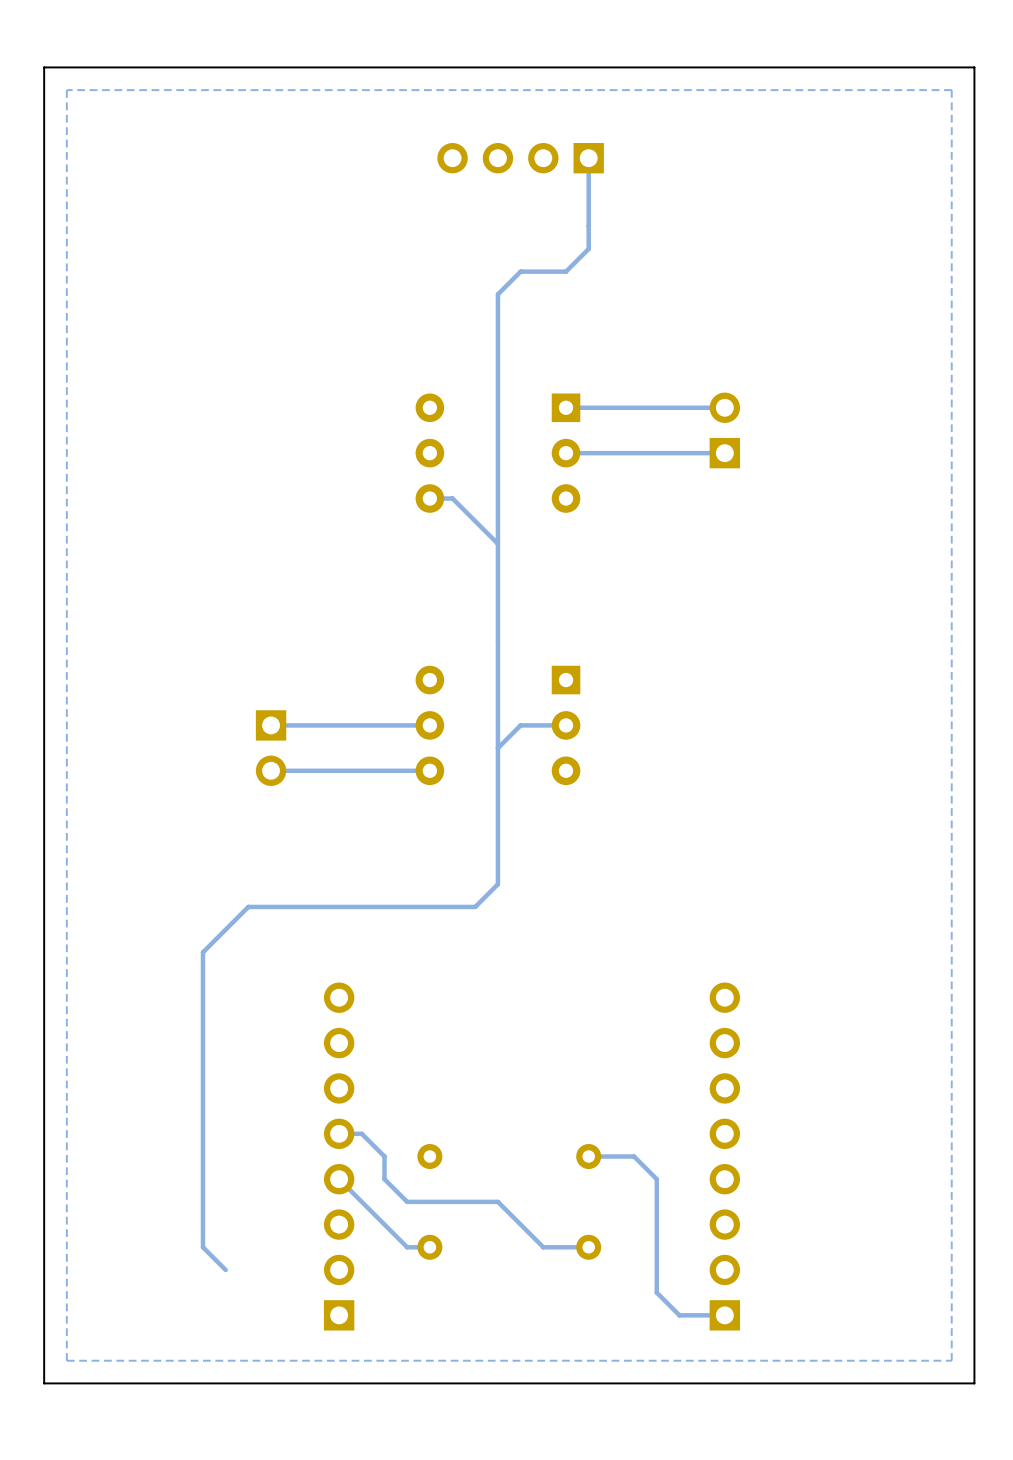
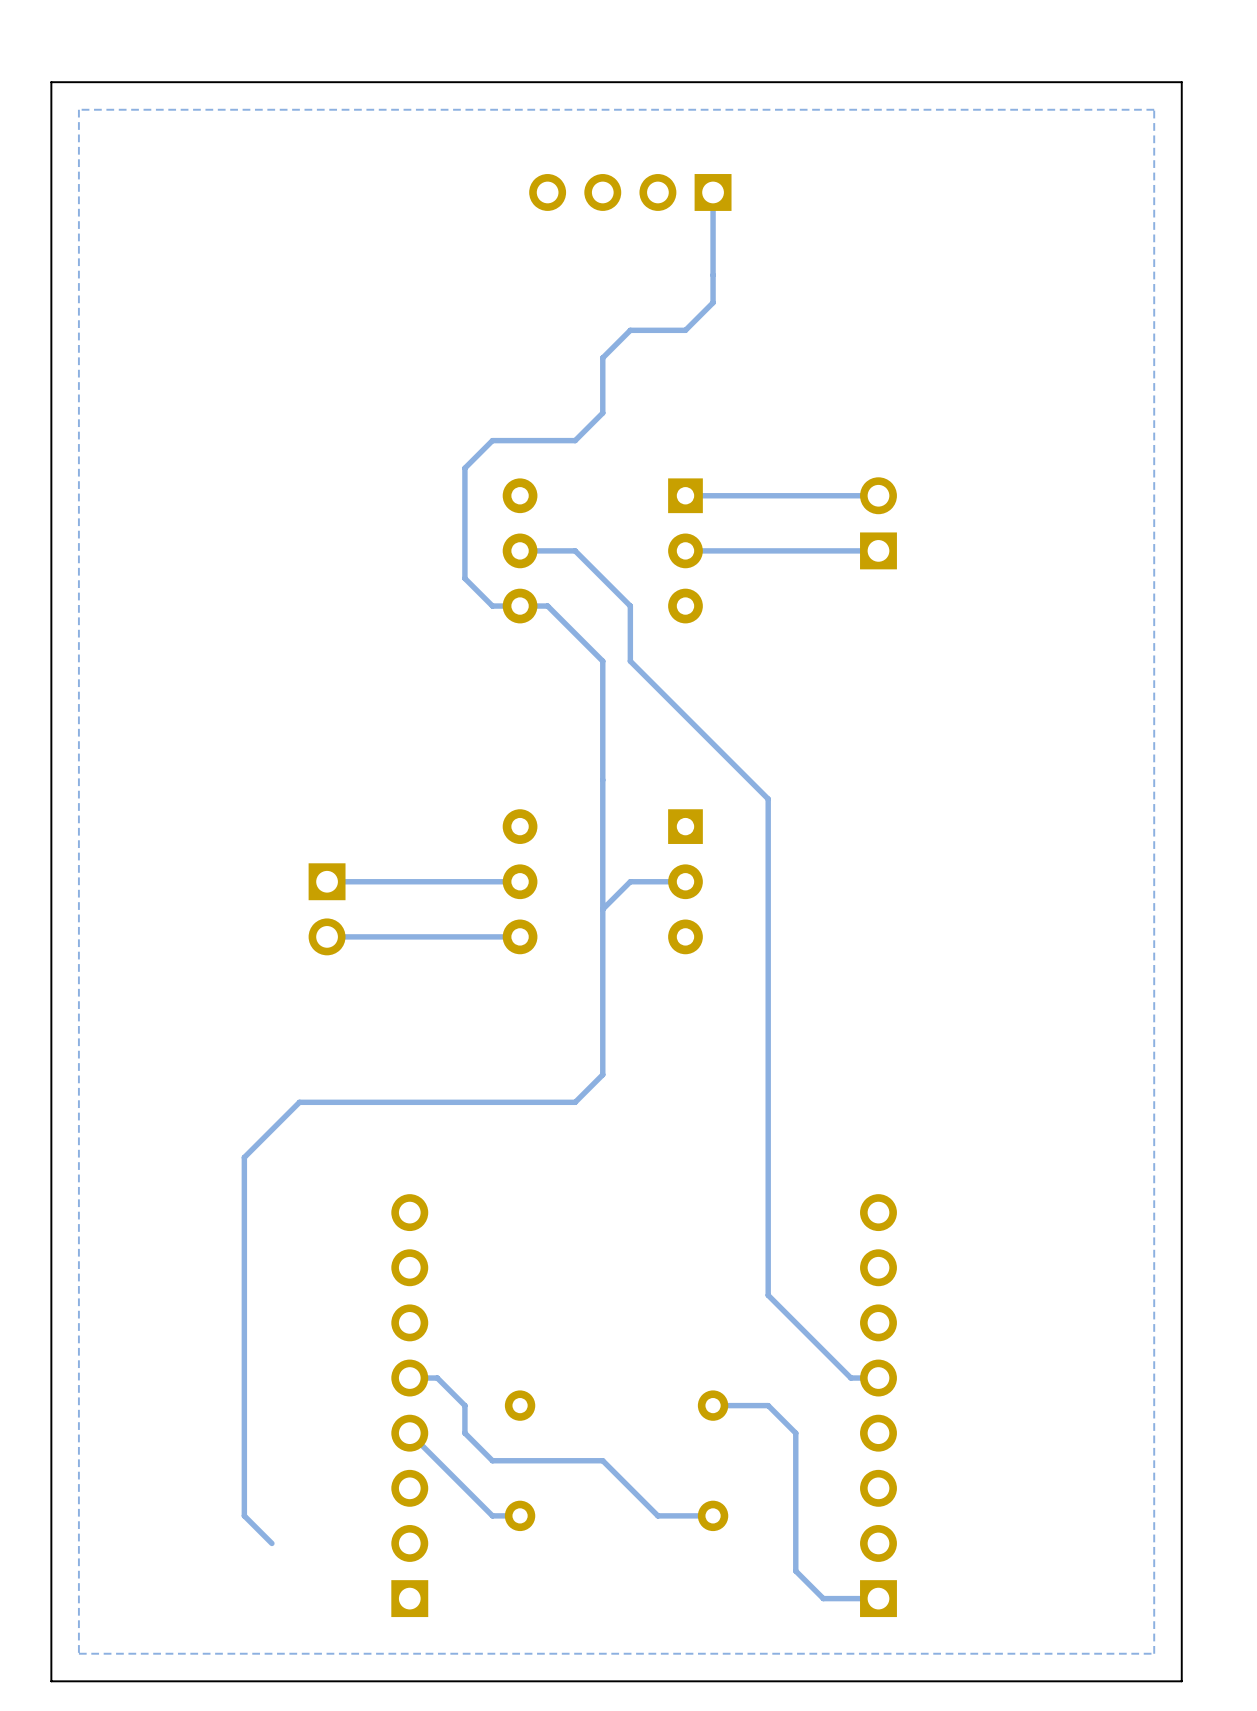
track: (497, 339) (497, 543) -> (602, 413) (575, 440) (492, 440) (464, 468) (464, 578) (492, 606) (520, 606)
track: none -> (520, 550) (575, 550) (630, 606) (630, 661) (768, 799) (768, 1295) (850, 1378) (878, 1378)

